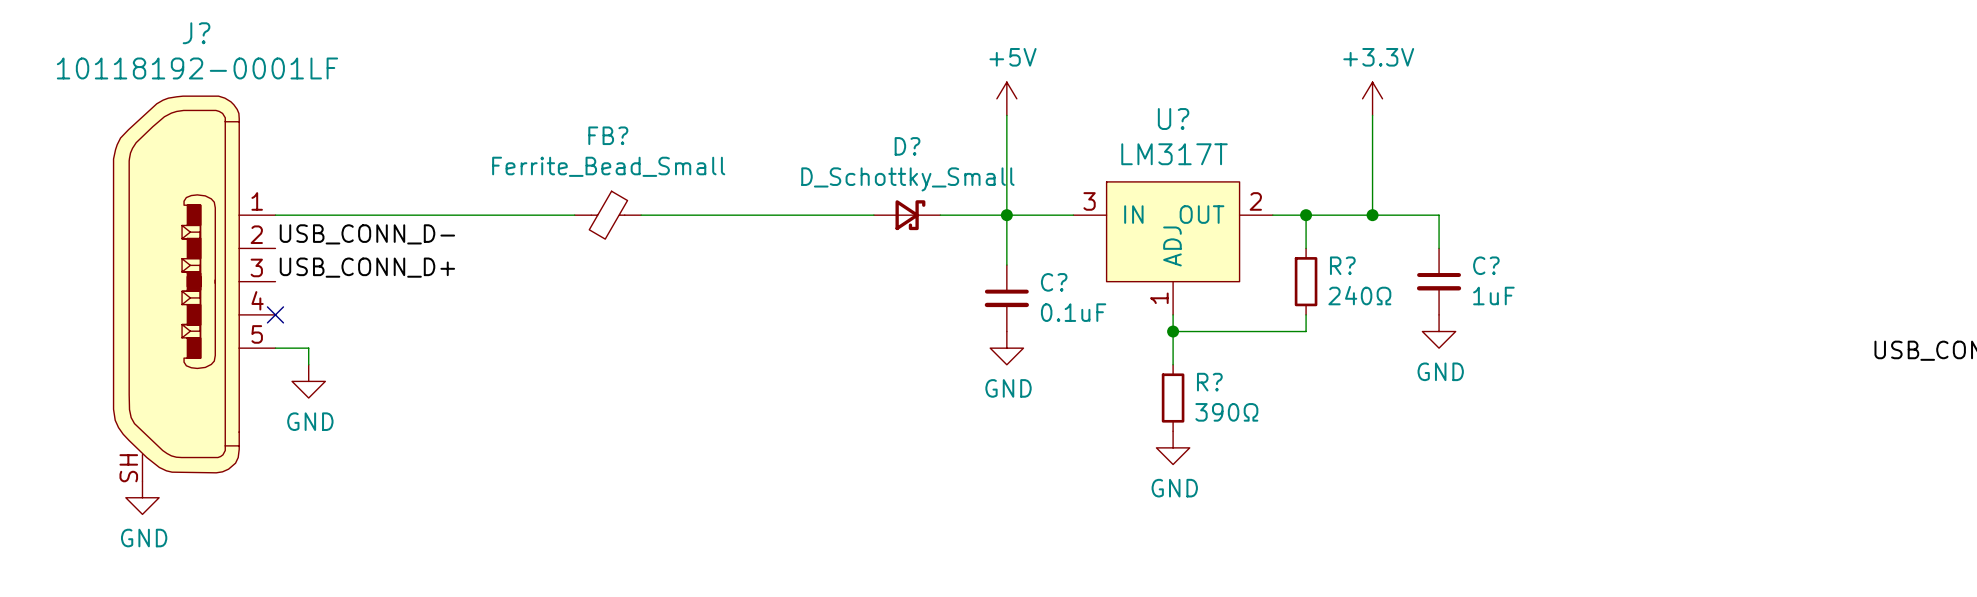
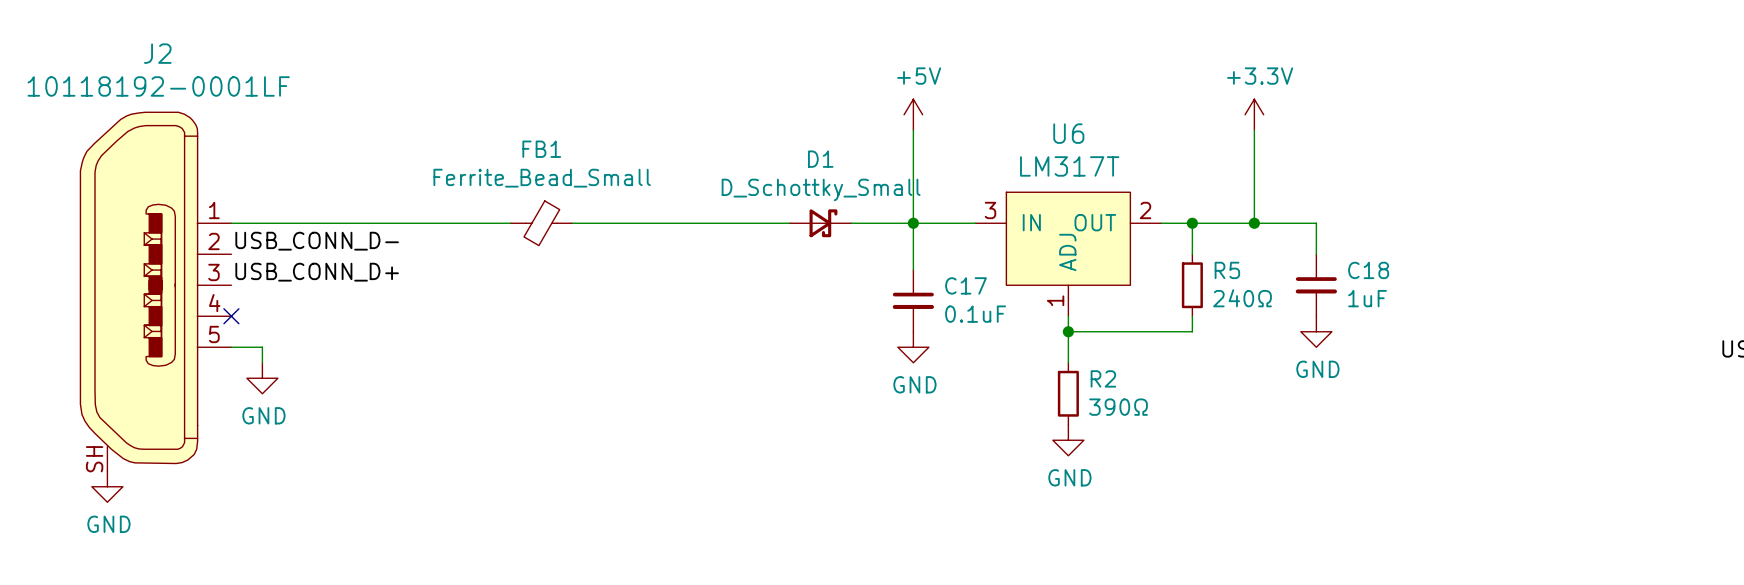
J? name: J? (196, 33) -> J2 (157, 53)
U? name: U? (1173, 119) -> U6 (1068, 133)
FB? name: FB? (608, 135) -> FB1 (541, 149)
D? name: D? (907, 146) -> D1 (820, 159)
R? name: R? (1342, 265) -> R5 (1227, 270)
C? name: C? (1486, 265) -> C18 (1368, 270)
C? name: C? (1054, 282) -> C17 (966, 285)
R? name: R? (1209, 382) -> R2 (1103, 378)

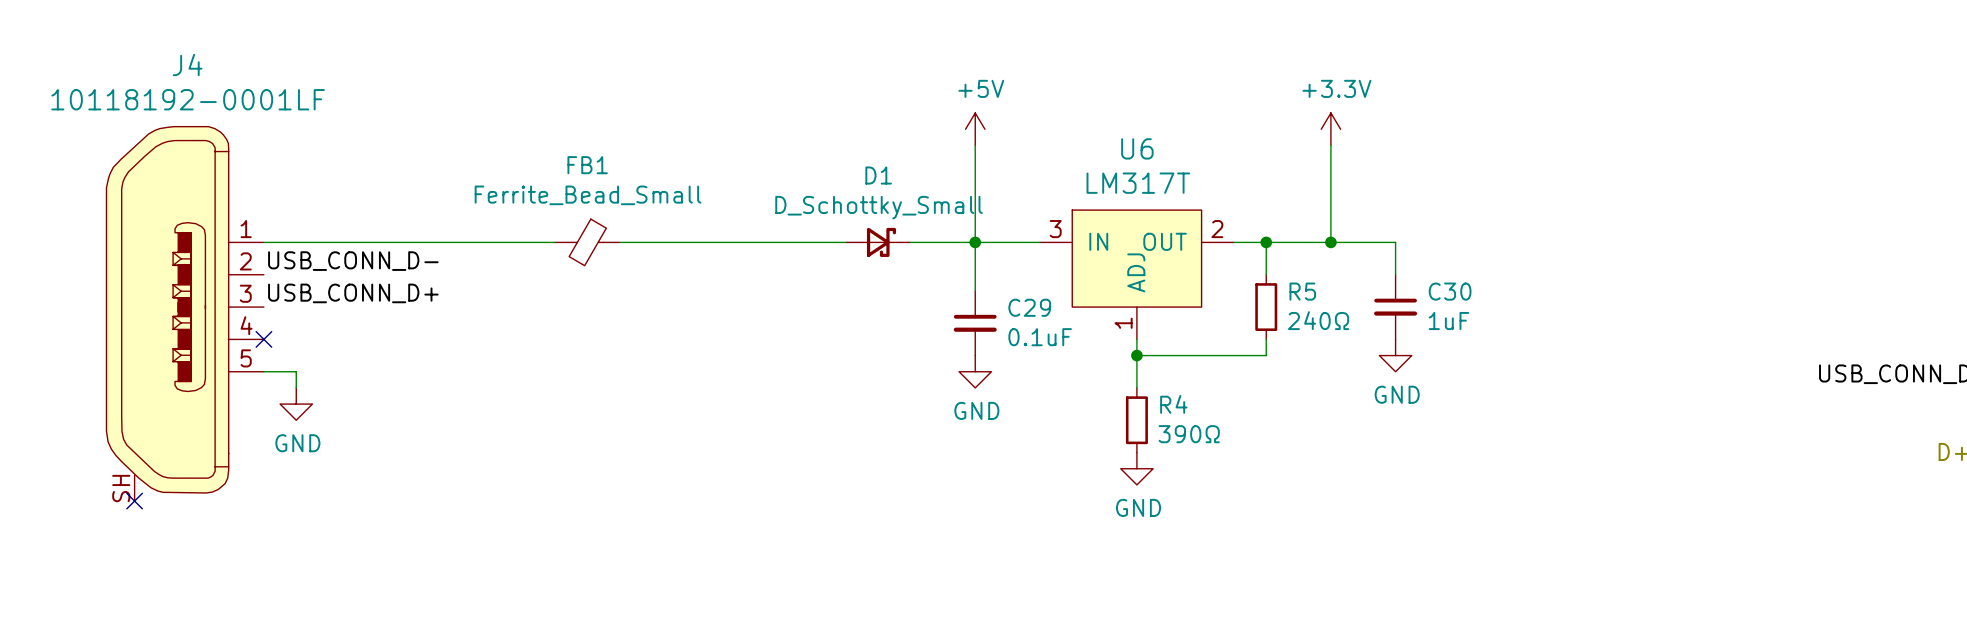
J2 name: J2 (157, 53) -> J4 (187, 65)
C18 name: C18 (1368, 270) -> C30 (1450, 291)
C17 name: C17 (966, 285) -> C29 (1029, 307)
R2 name: R2 (1103, 378) -> R4 (1173, 404)
no-connect mark: none -> (134, 501)
power symbol: GND (107, 486) -> none

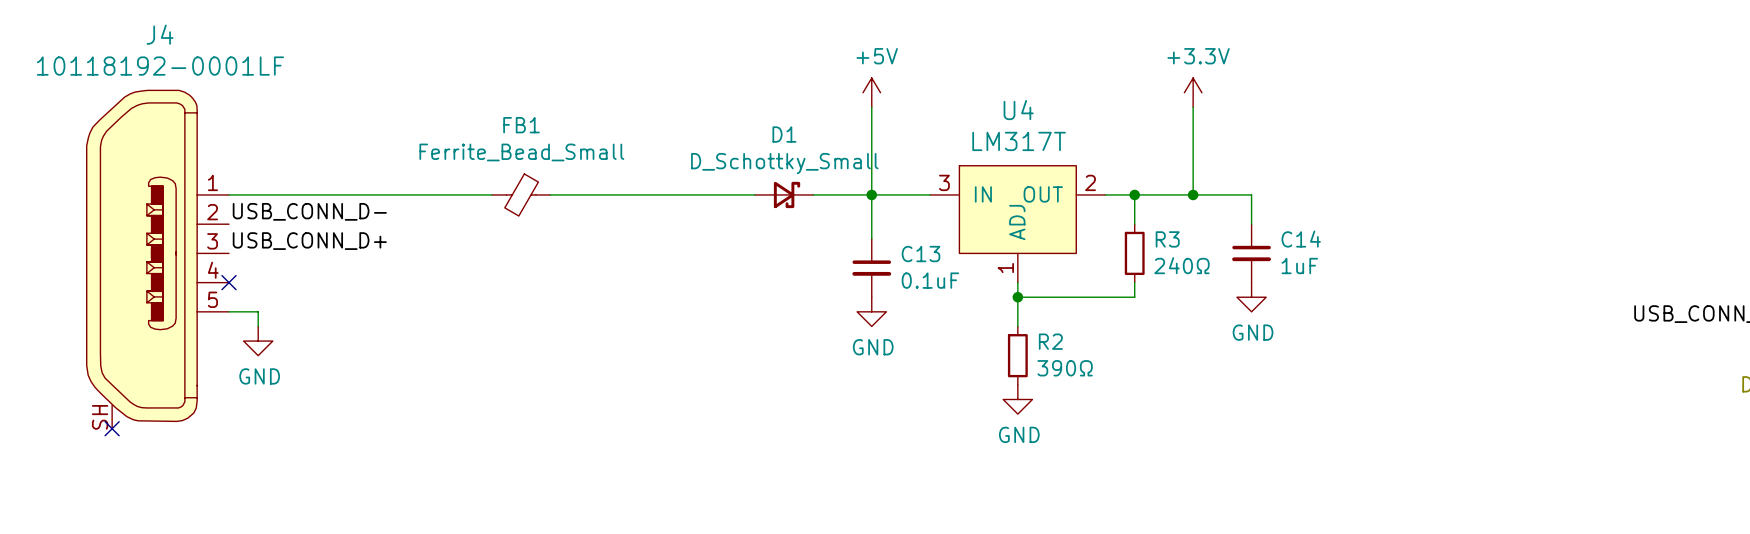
U6 name: U6 (1137, 148) -> U4 (1018, 110)
R5 name: R5 (1302, 291) -> R3 (1167, 239)
C30 name: C30 (1450, 291) -> C14 (1301, 239)
C29 name: C29 (1029, 307) -> C13 (921, 254)
R4 name: R4 (1173, 404) -> R2 (1050, 341)

